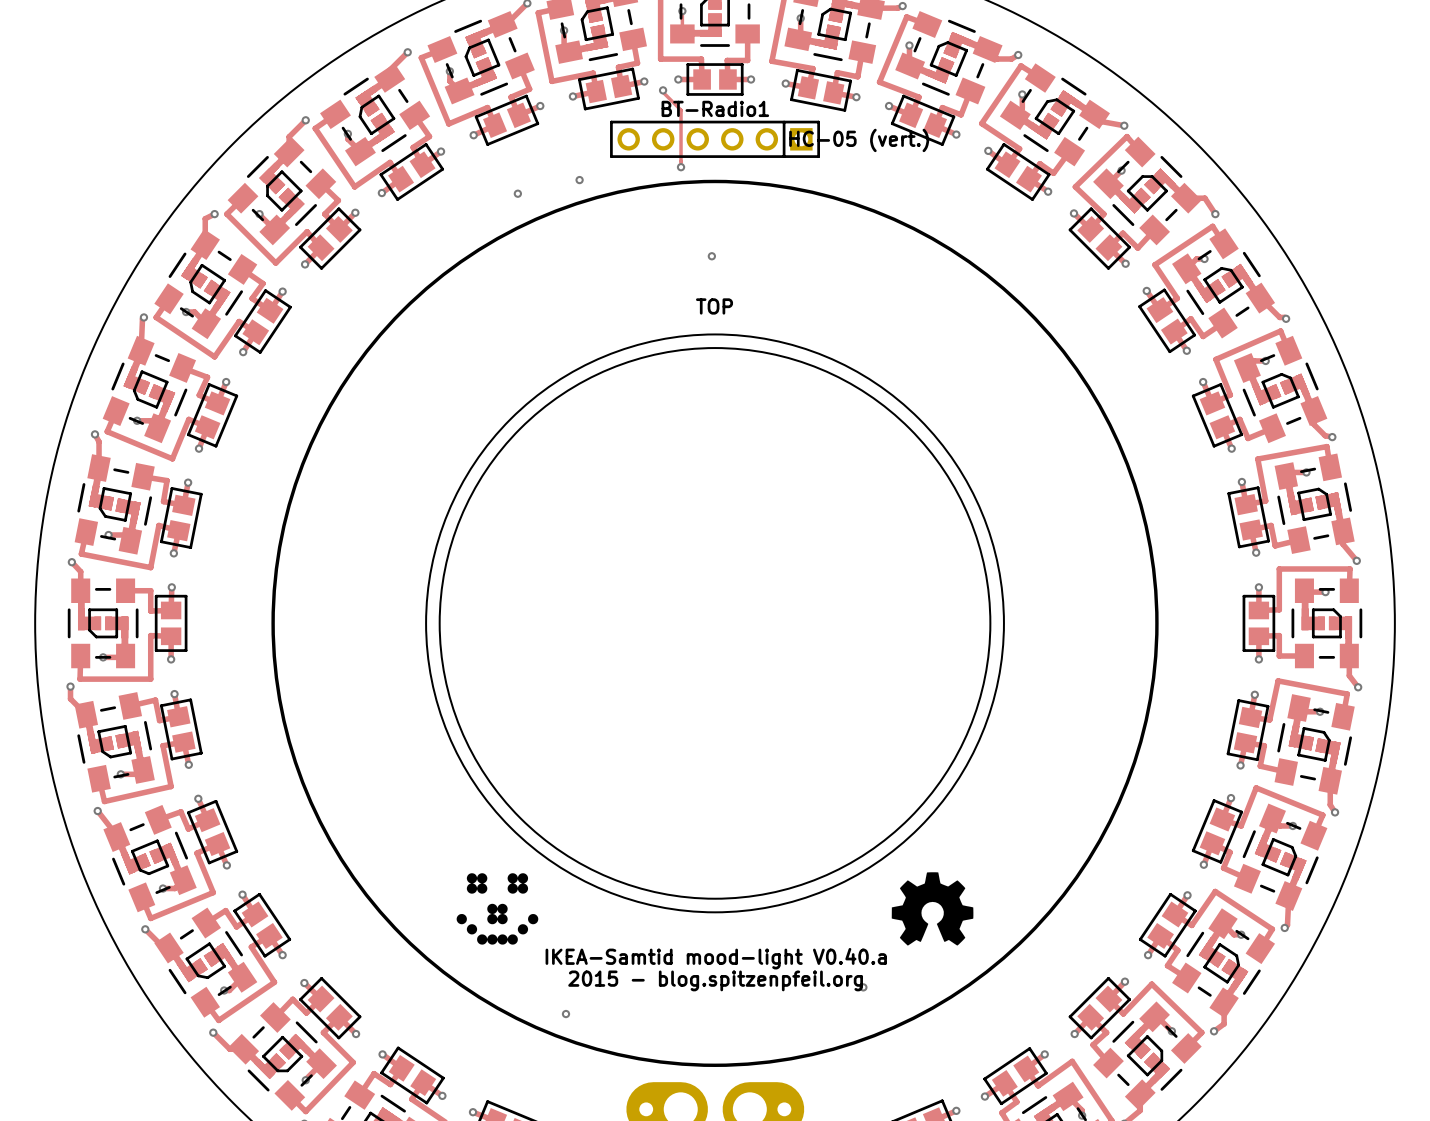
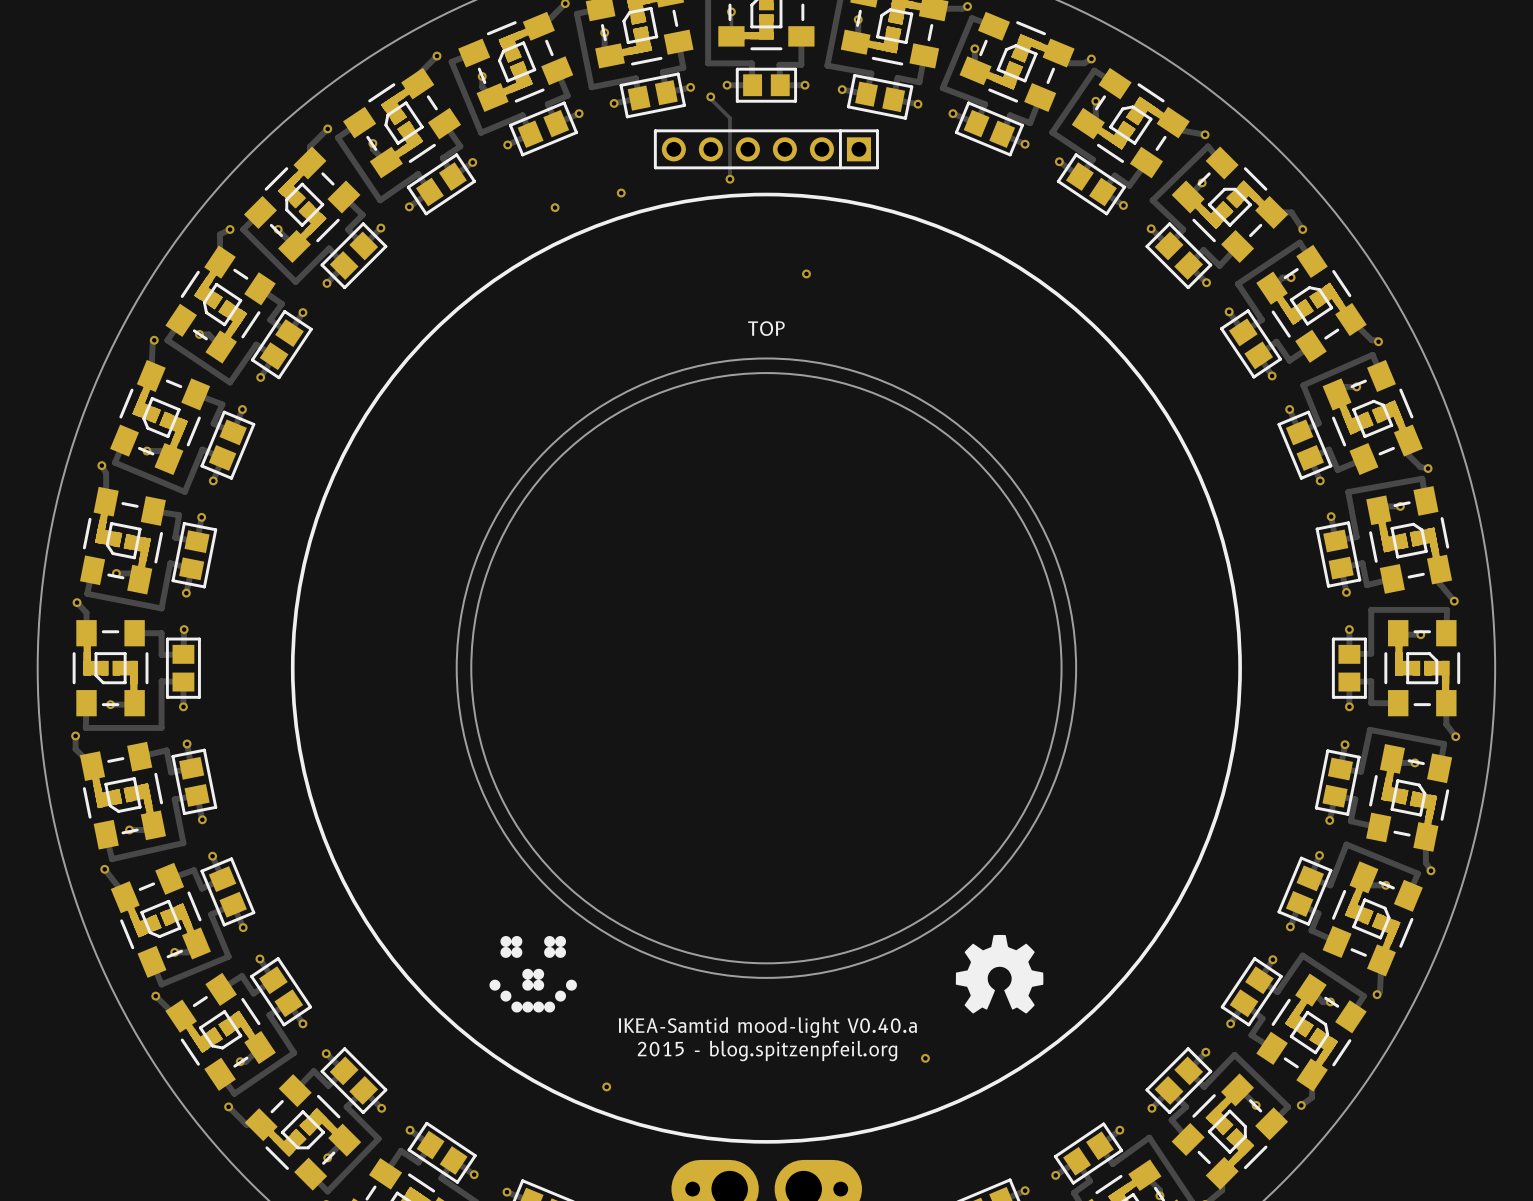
BT-Radio1 name: BT-Radio1 (715, 108) -> none
BT-Radio1 value: HC-05 (vert.) (859, 140) -> none
via position: (711, 256) -> (806, 273)

